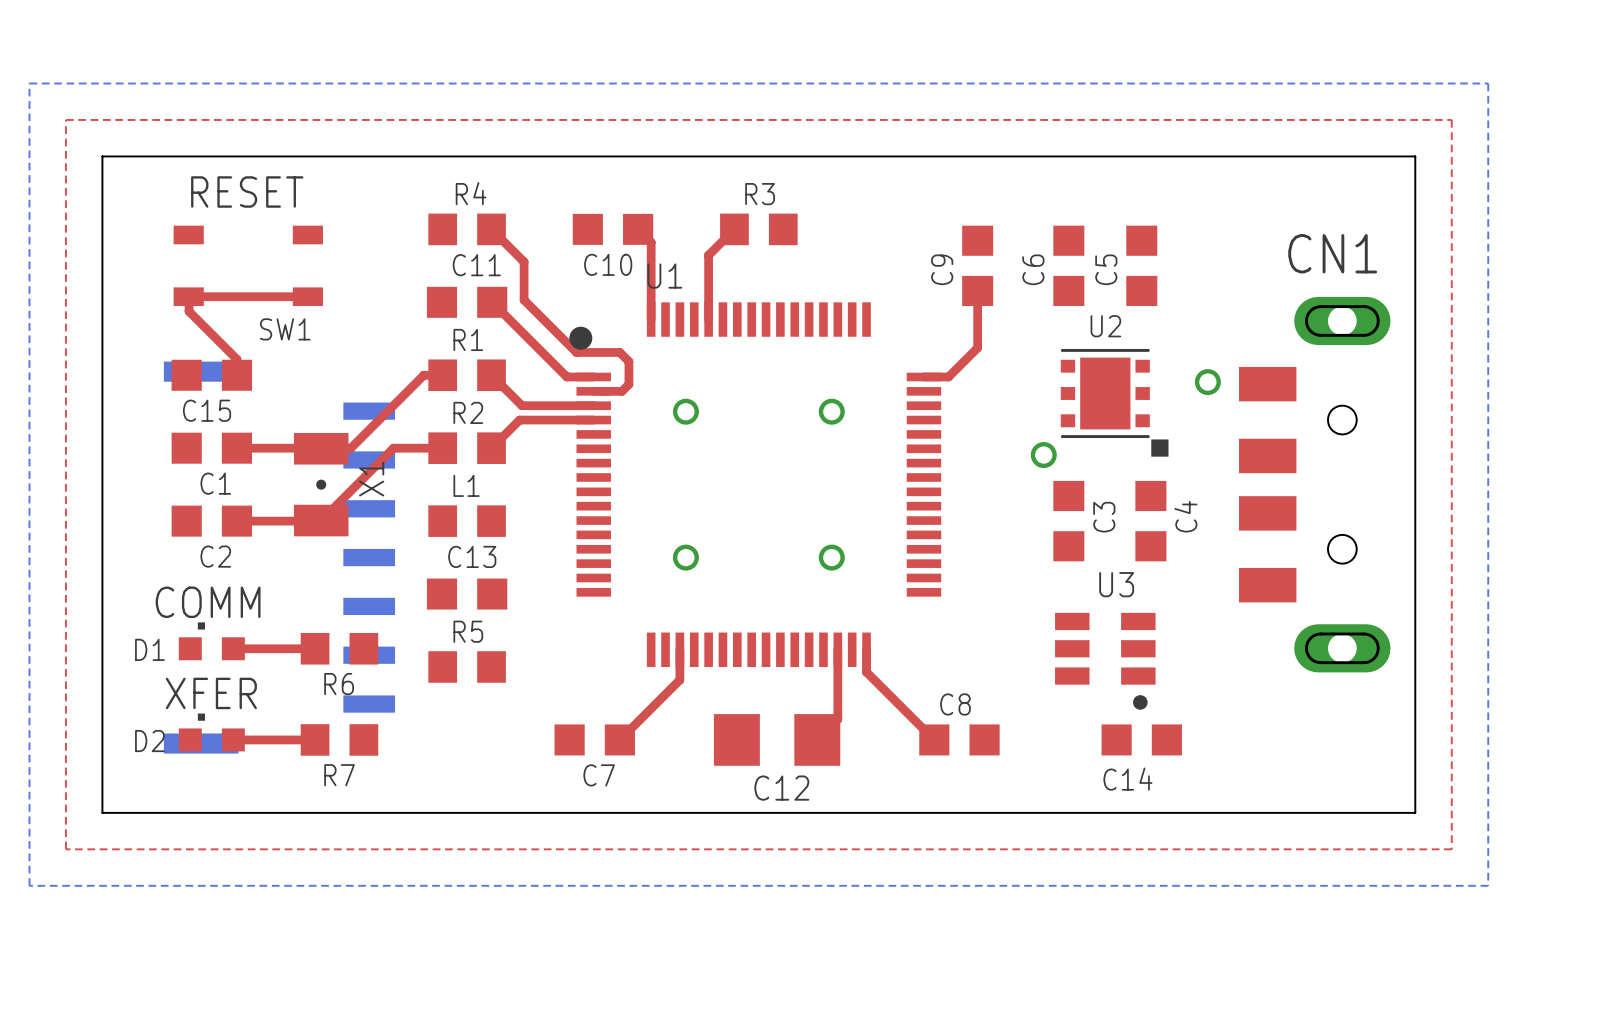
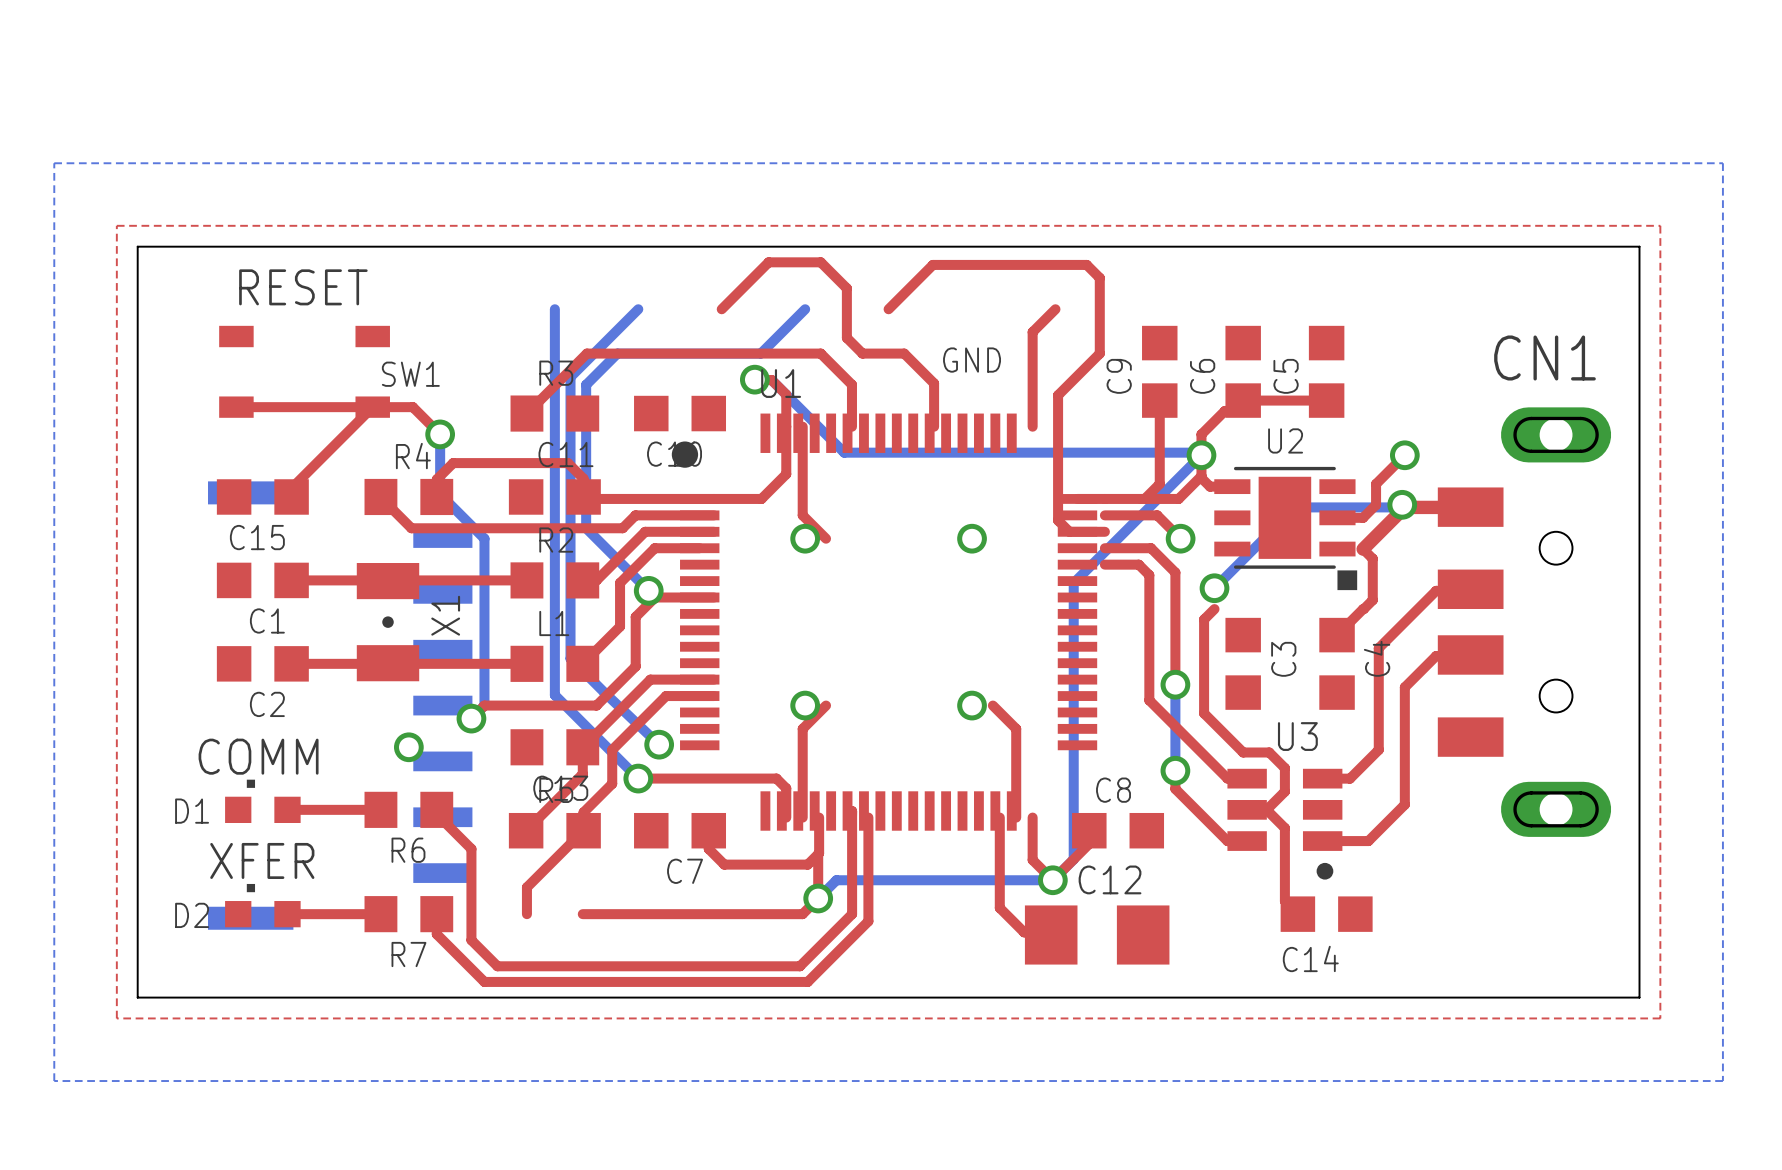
top zone outline: (65, 119) (1451, 119) (1451, 849) (65, 849) (65, 119) -> (116, 225) (116, 1018) (1660, 1018) (1660, 225) (116, 225)
bottom track: none -> (554, 309) (554, 695) (638, 778)
bottom track: none -> (638, 309) (570, 377) (570, 658) (659, 744)
top track: none -> (721, 309) (768, 262) (820, 262) (846, 288) (846, 337) (862, 353) (904, 353) (934, 383) (934, 426)
bottom track: none -> (805, 309) (760, 353) (617, 353) (586, 384) (586, 528) (648, 590)
top track: none -> (888, 309) (932, 264) (1086, 264) (1099, 277) (1099, 353) (1058, 395) (1058, 520) (1069, 531) (1104, 531)
top track: none -> (1055, 309) (1032, 332) (1032, 426)
R4 position: (467, 229) -> (408, 496)
top track: (491, 229) (524, 261) (524, 300) (576, 352) (619, 352) (628, 361) (628, 384) (621, 391) (606, 391) -> none
C10 position: (612, 229) -> (680, 413)
top track: (638, 229) (651, 242) (651, 319) -> none
top track: (734, 229) (708, 255) (708, 319) -> none
R3 position: (758, 229) -> (554, 413)
text: none -> GND (972, 360)
C9 position: (977, 265) -> (1159, 371)
via: none -> (754, 379)
top track: none -> (755, 380) (771, 380) (786, 394) (786, 474) (761, 498) (699, 498)
bottom track: none -> (755, 380) (771, 380) (844, 452) (1198, 452) (1201, 455) (1073, 583) (1073, 859) (1052, 880) (836, 880) (818, 898)
top track: (977, 290) (977, 347) (948, 376) -> (1201, 476) (1178, 498) (1105, 498)
top track: none -> (1159, 400) (1159, 483) (1144, 498)
top track: none -> (1326, 400) (1243, 400) (1232, 410) (1224, 410) (1201, 434) (1201, 478) (1210, 486) (1232, 486)
top track: (189, 297) (189, 311) (236, 359) (236, 367) -> (440, 434) (412, 407) (372, 407) (291, 488)
top track: none -> (526, 413) (586, 353) (820, 353) (851, 384) (851, 426)
C11 position: (467, 302) -> (554, 496)
top track: (492, 302) (566, 376) -> (436, 496) (436, 479) (453, 463) (567, 463) (583, 478) (583, 496) (585, 498) (669, 498)
top track: none -> (802, 426) (802, 515) (826, 538)
bottom track: none -> (440, 434) (440, 494) (484, 538) (484, 705) (471, 718)
via: none -> (440, 434)
SW1 name position: SW1 (285, 329) -> SW1 (410, 374)
via: none -> (1201, 455)
via: none -> (1404, 455)
top track: none -> (1404, 460) (1404, 455) (1376, 484) (1376, 504) (1363, 517) (1337, 517)
U2 footprint: [1060, 348, 1169, 457] -> [1214, 466, 1358, 591]
top track: none -> (380, 496) (411, 528) (622, 528) (635, 515) (699, 515)
top track: (442, 375) (423, 375) (350, 448) (320, 448) -> none
R1: (467, 375) -> none
top track: (491, 375) (521, 405) (546, 405) -> none
bottom track: none -> (1404, 507) (1295, 507) (1214, 588)
top track: none -> (1470, 507) (1404, 507) (1363, 549) (1372, 558) (1372, 600) (1337, 635)
top track: none -> (1104, 515) (1157, 515) (1180, 538)
via: none -> (1180, 538)
top track: (554, 420) (519, 420) (491, 448) -> (645, 531) (596, 580) (582, 580)
top track: none -> (654, 548) (620, 583) (620, 626) (582, 663)
top track: none -> (1104, 548) (1151, 548) (1175, 572) (1175, 684)
top track: none -> (1104, 564) (1138, 564) (1149, 575) (1149, 700) (1227, 778) (1247, 778)
top track: (393, 448) (320, 521) -> (470, 580) (393, 580) (388, 574) (387, 580)
top track: none -> (1470, 589) (1436, 590) (1378, 648) (1378, 749) (1350, 778) (1322, 778)
via: none -> (648, 590)
top track: none -> (714, 597) (655, 597) (635, 616) (635, 666) (596, 705) (484, 705) (471, 718)
top track: none -> (1214, 609) (1204, 619) (1204, 713) (1243, 752) (1269, 752) (1284, 768) (1284, 791) (1266, 809)
top track: none -> (1470, 654) (1436, 656) (1404, 687) (1404, 804) (1368, 841) (1322, 841)
top track: none -> (387, 663) (388, 669) (393, 663) (526, 663)
top track: none -> (714, 679) (650, 679) (582, 747) (582, 774) (526, 830)
bottom track: none -> (1175, 684) (1175, 770)
via: none -> (1175, 684)
top track: none -> (714, 696) (666, 696) (612, 749) (612, 783) (583, 812) (583, 830) (526, 887) (526, 914)
top track: none -> (826, 705) (802, 728) (802, 817)
top track: none -> (992, 705) (1016, 728) (1016, 817)
via: none -> (471, 718)
via: none -> (659, 744)
via: none -> (408, 747)
C13 position: (467, 594) -> (554, 830)
top track: none -> (1175, 770) (1175, 789) (1227, 841) (1247, 841)
via: none -> (1175, 770)
top track: none -> (638, 778) (776, 778) (786, 788) (786, 817)
via: none -> (638, 778)
top track: none -> (436, 809) (436, 814) (471, 848) (471, 940) (497, 966) (799, 966) (852, 914) (852, 811) (851, 817)
top track: none -> (1266, 809) (1284, 828) (1284, 901) (1297, 914)
top track: (679, 649) (679, 679) (619, 739) -> none
top track: (837, 649) (837, 719) (817, 739) -> none
top track: (866, 649) (866, 672) (934, 739) -> none
top track: none -> (819, 817) (819, 853) (807, 864) (724, 864) (708, 849) (708, 830)
top track: none -> (868, 817) (868, 921) (807, 981) (484, 981) (436, 934) (436, 914)
top track: none -> (999, 817) (999, 908) (1024, 932) (1048, 932) (1051, 935)
top track: none -> (1032, 817) (1032, 860) (1052, 880) (1089, 843) (1089, 830)
R5 position: (467, 667) -> (554, 747)
top track: none -> (818, 854) (818, 898) (802, 914) (582, 914)
via: none -> (1052, 880)
via: none -> (818, 898)
C7 position: (594, 739) -> (680, 830)
C12 position: (777, 739) -> (1097, 935)
C8 position: (959, 739) -> (1118, 830)
C12 name position: C12 (781, 788) -> C12 (1110, 879)

